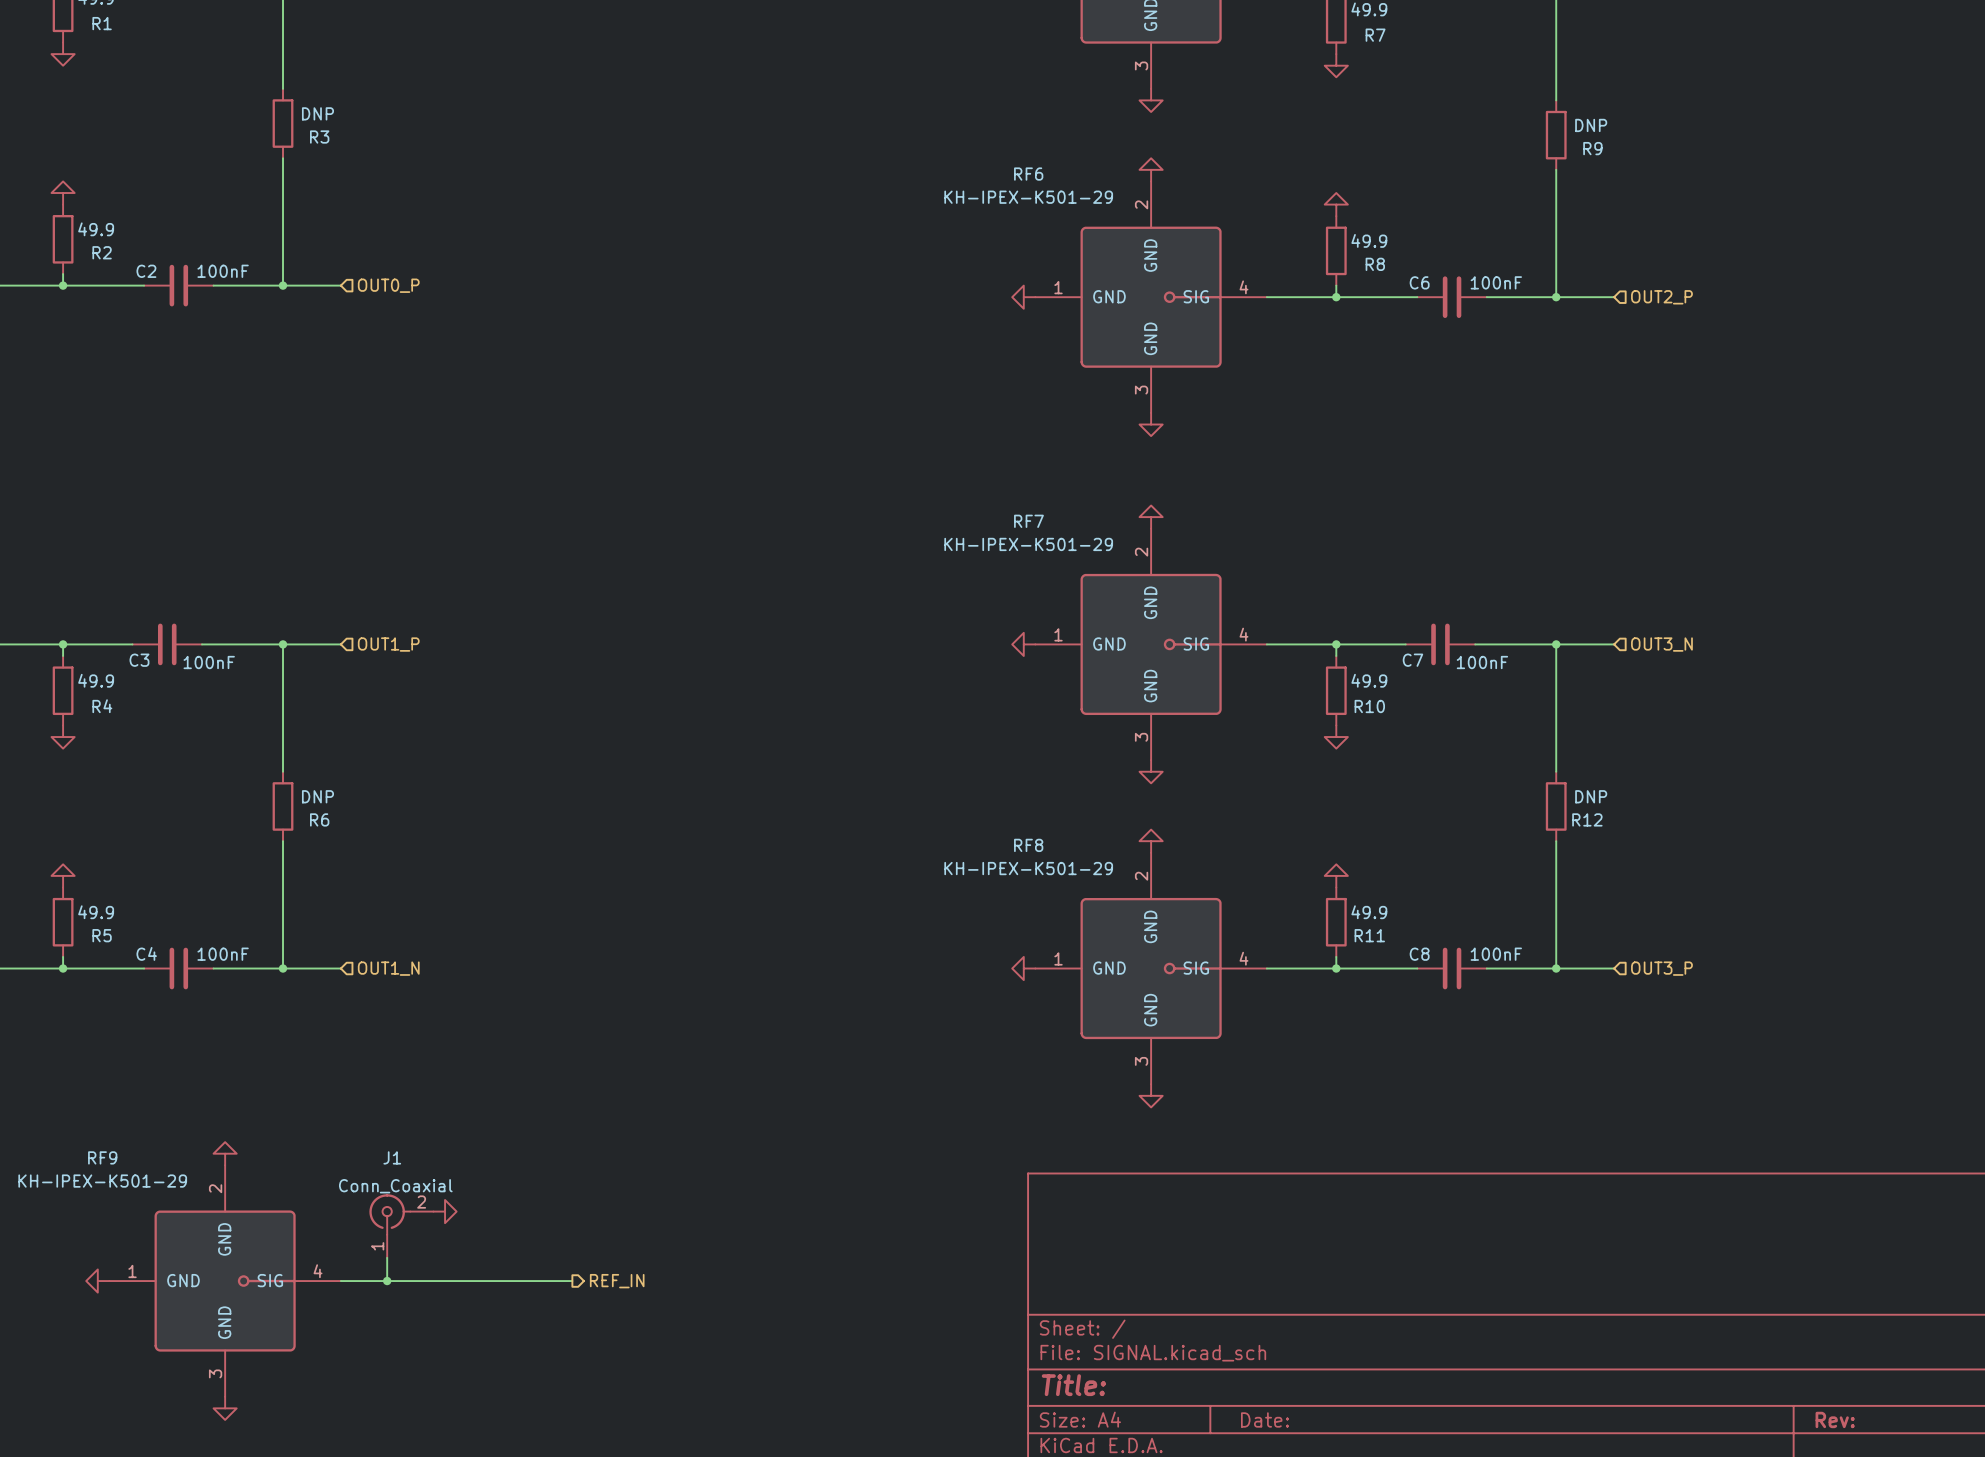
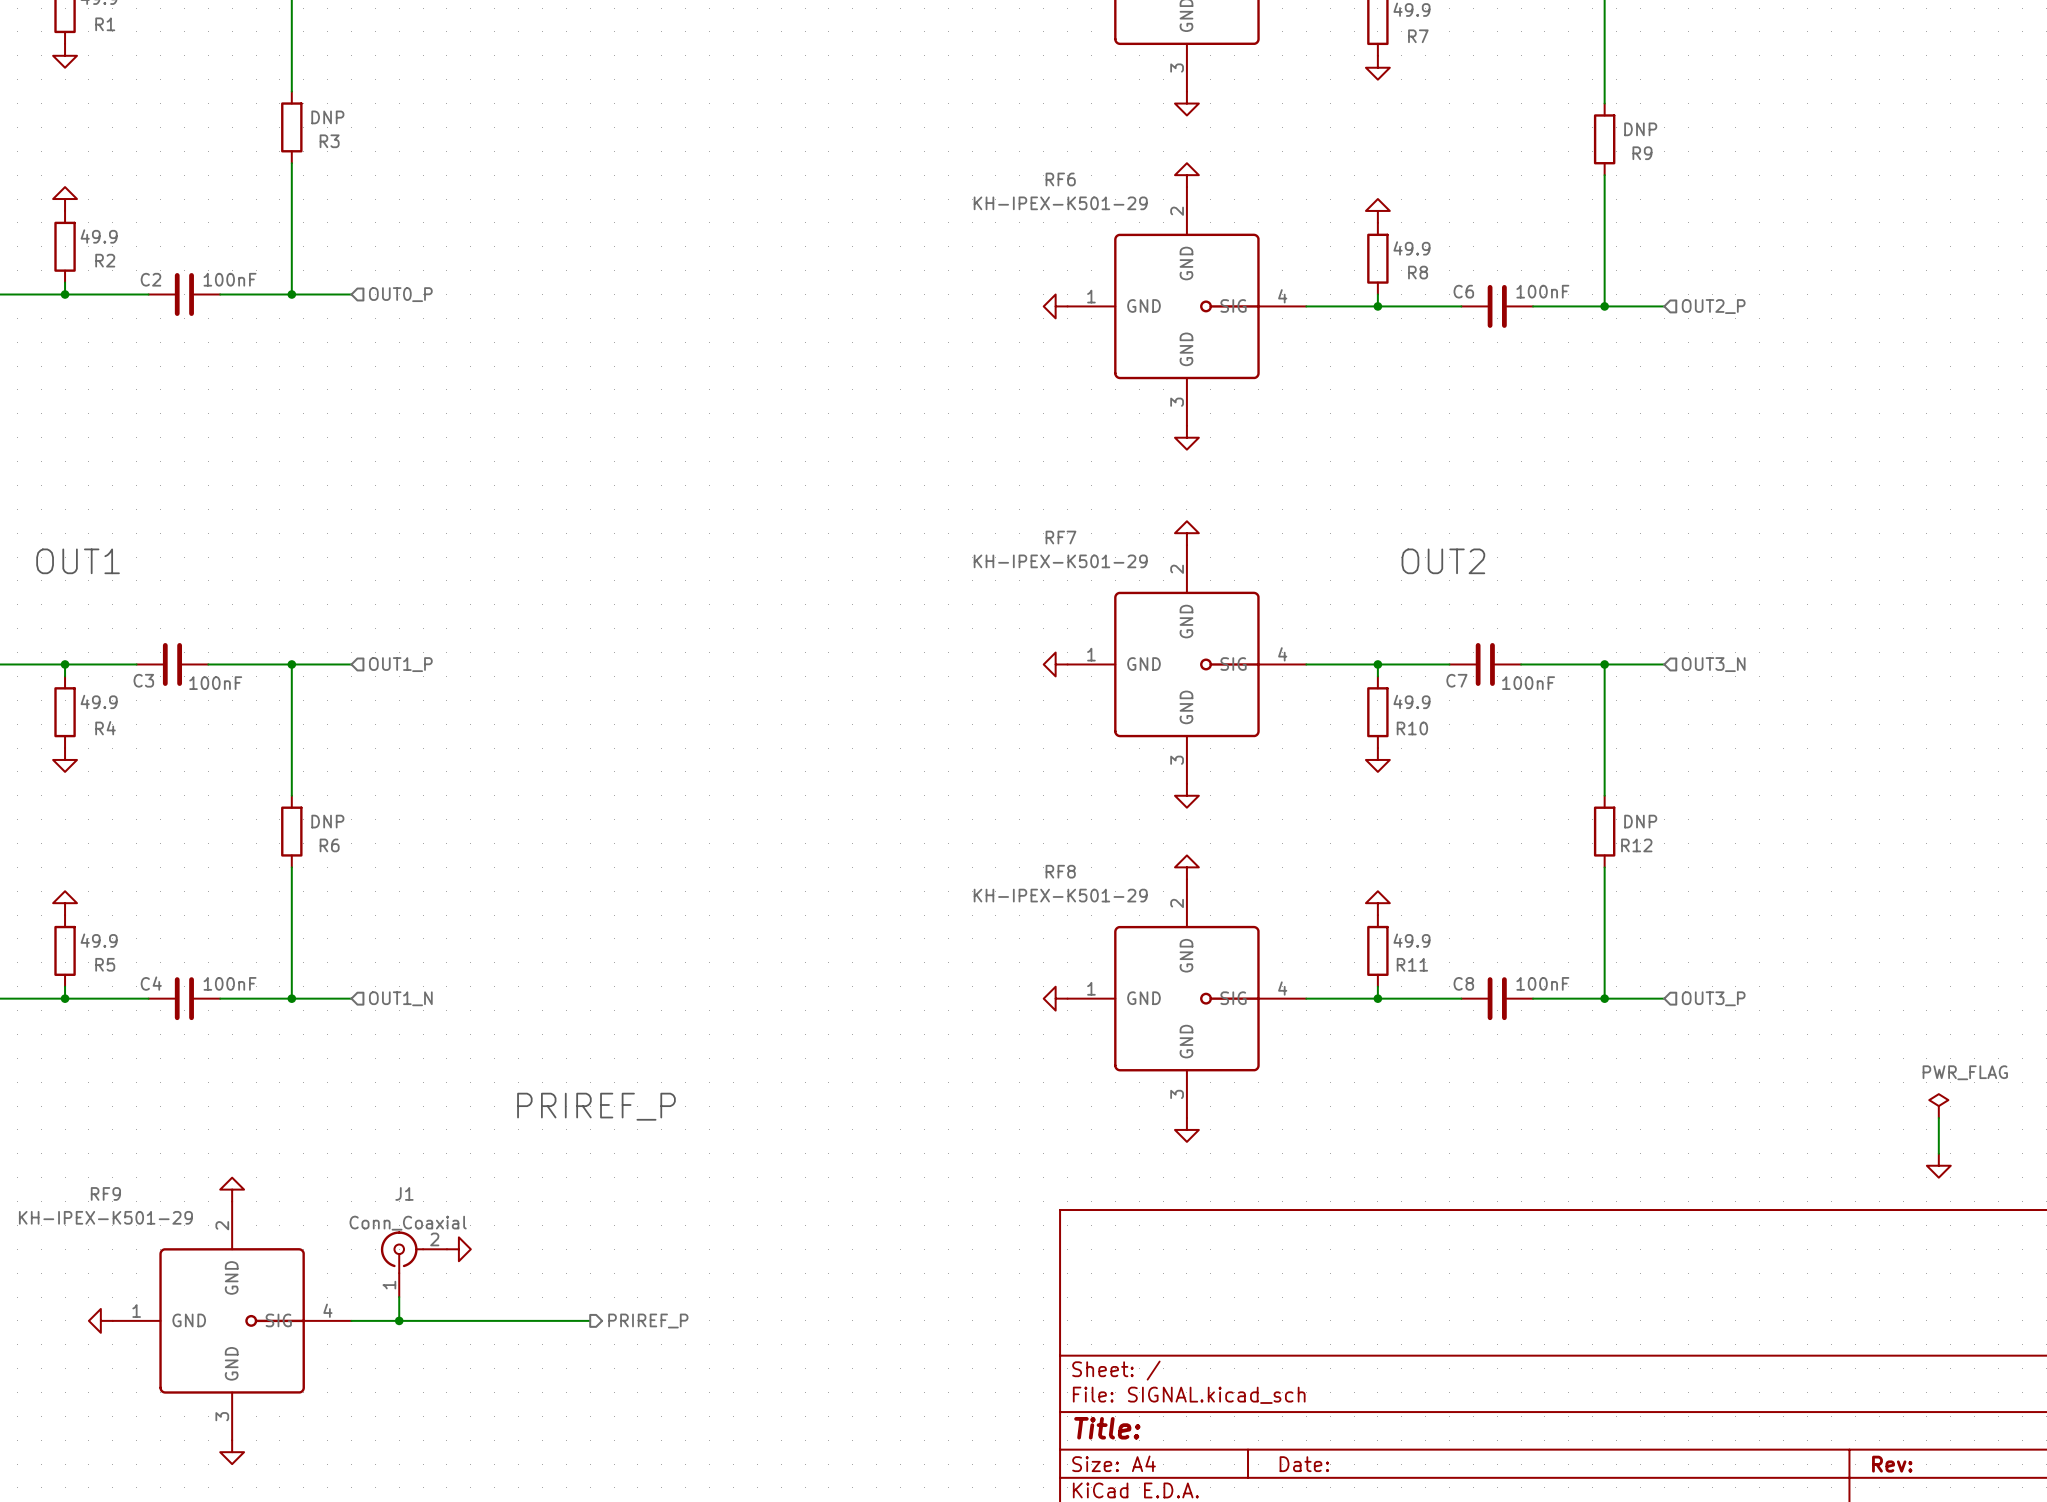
text: none -> OUT1 (78, 561)
text: none -> OUT2 (1443, 561)
power symbol: none -> PWR_FLAG (1938, 1106)
text: none -> PRIREF_P (596, 1106)
wire: none -> (1938, 1118) (1938, 1153)
power symbol: none -> (1938, 1165)
hierarchical label: REF_IN (617, 1281) -> PRIREF_P (648, 1321)

